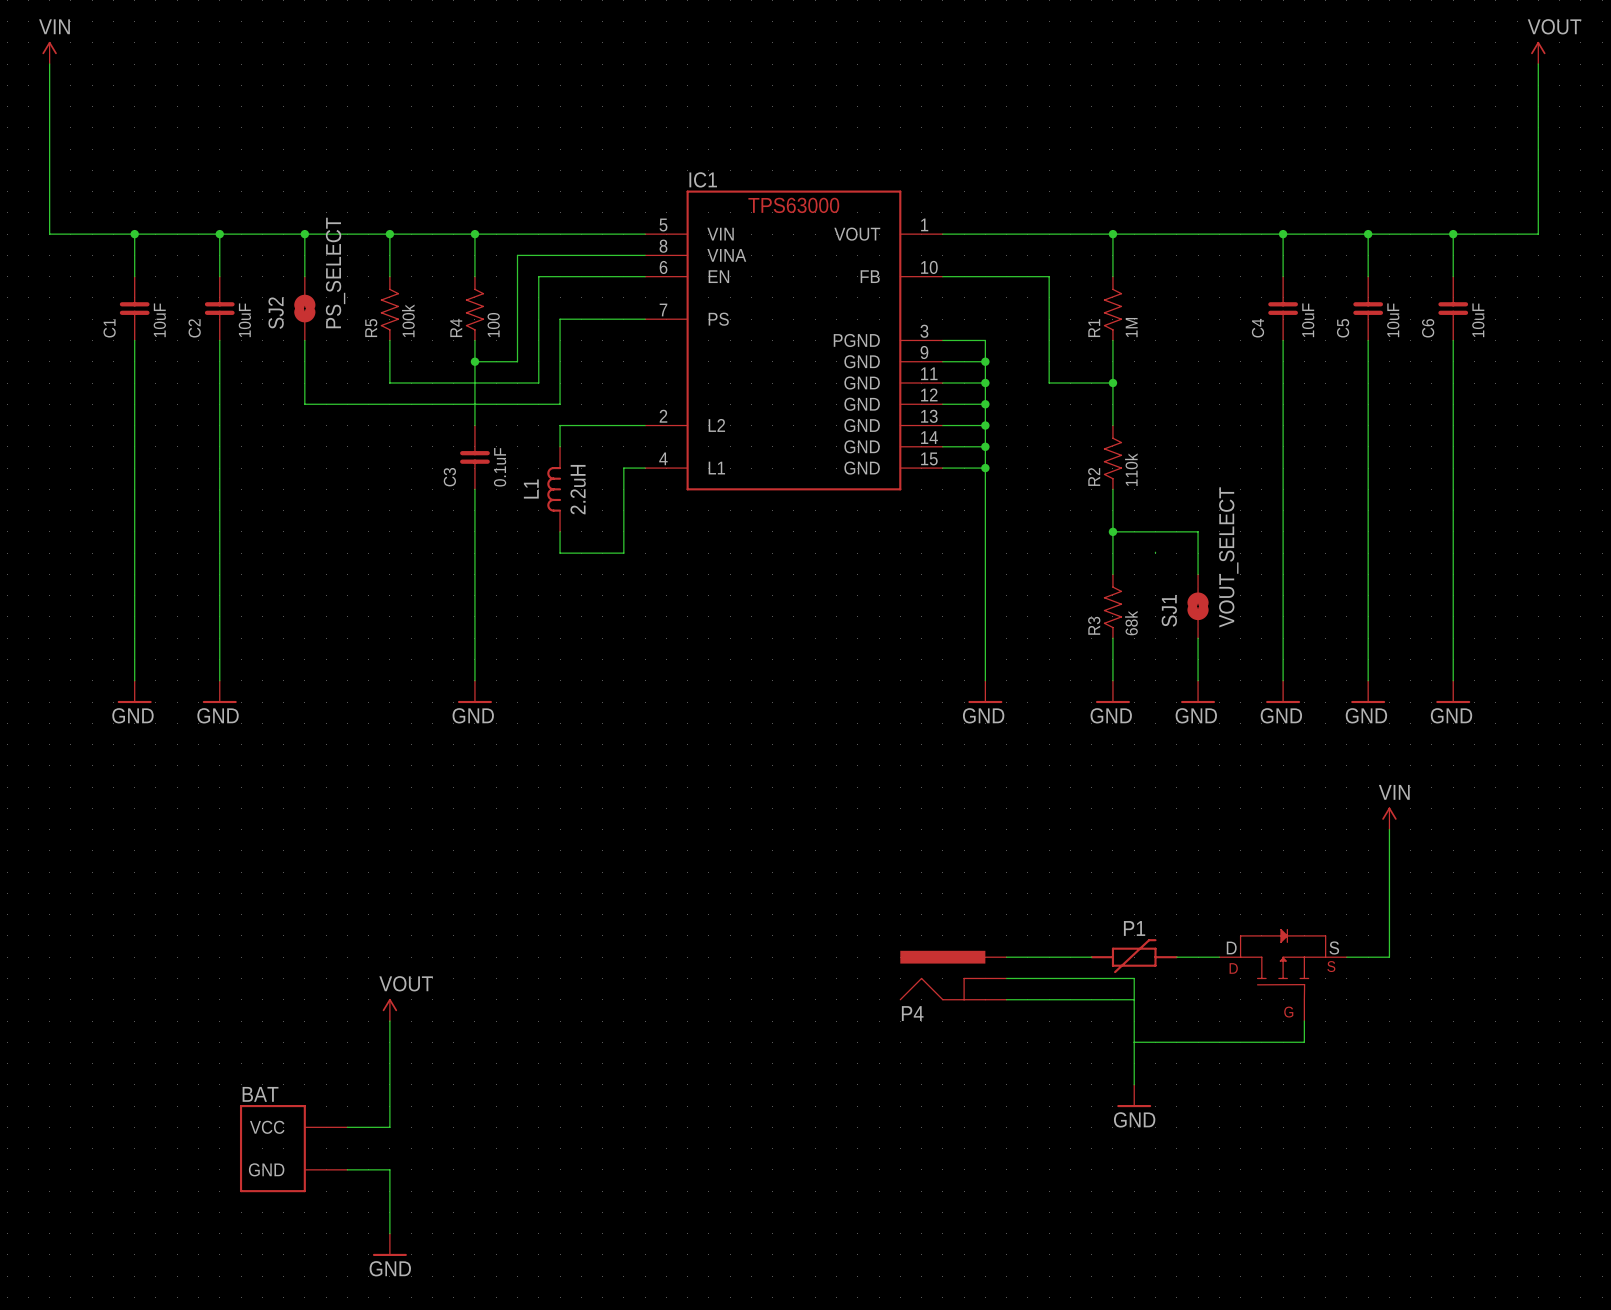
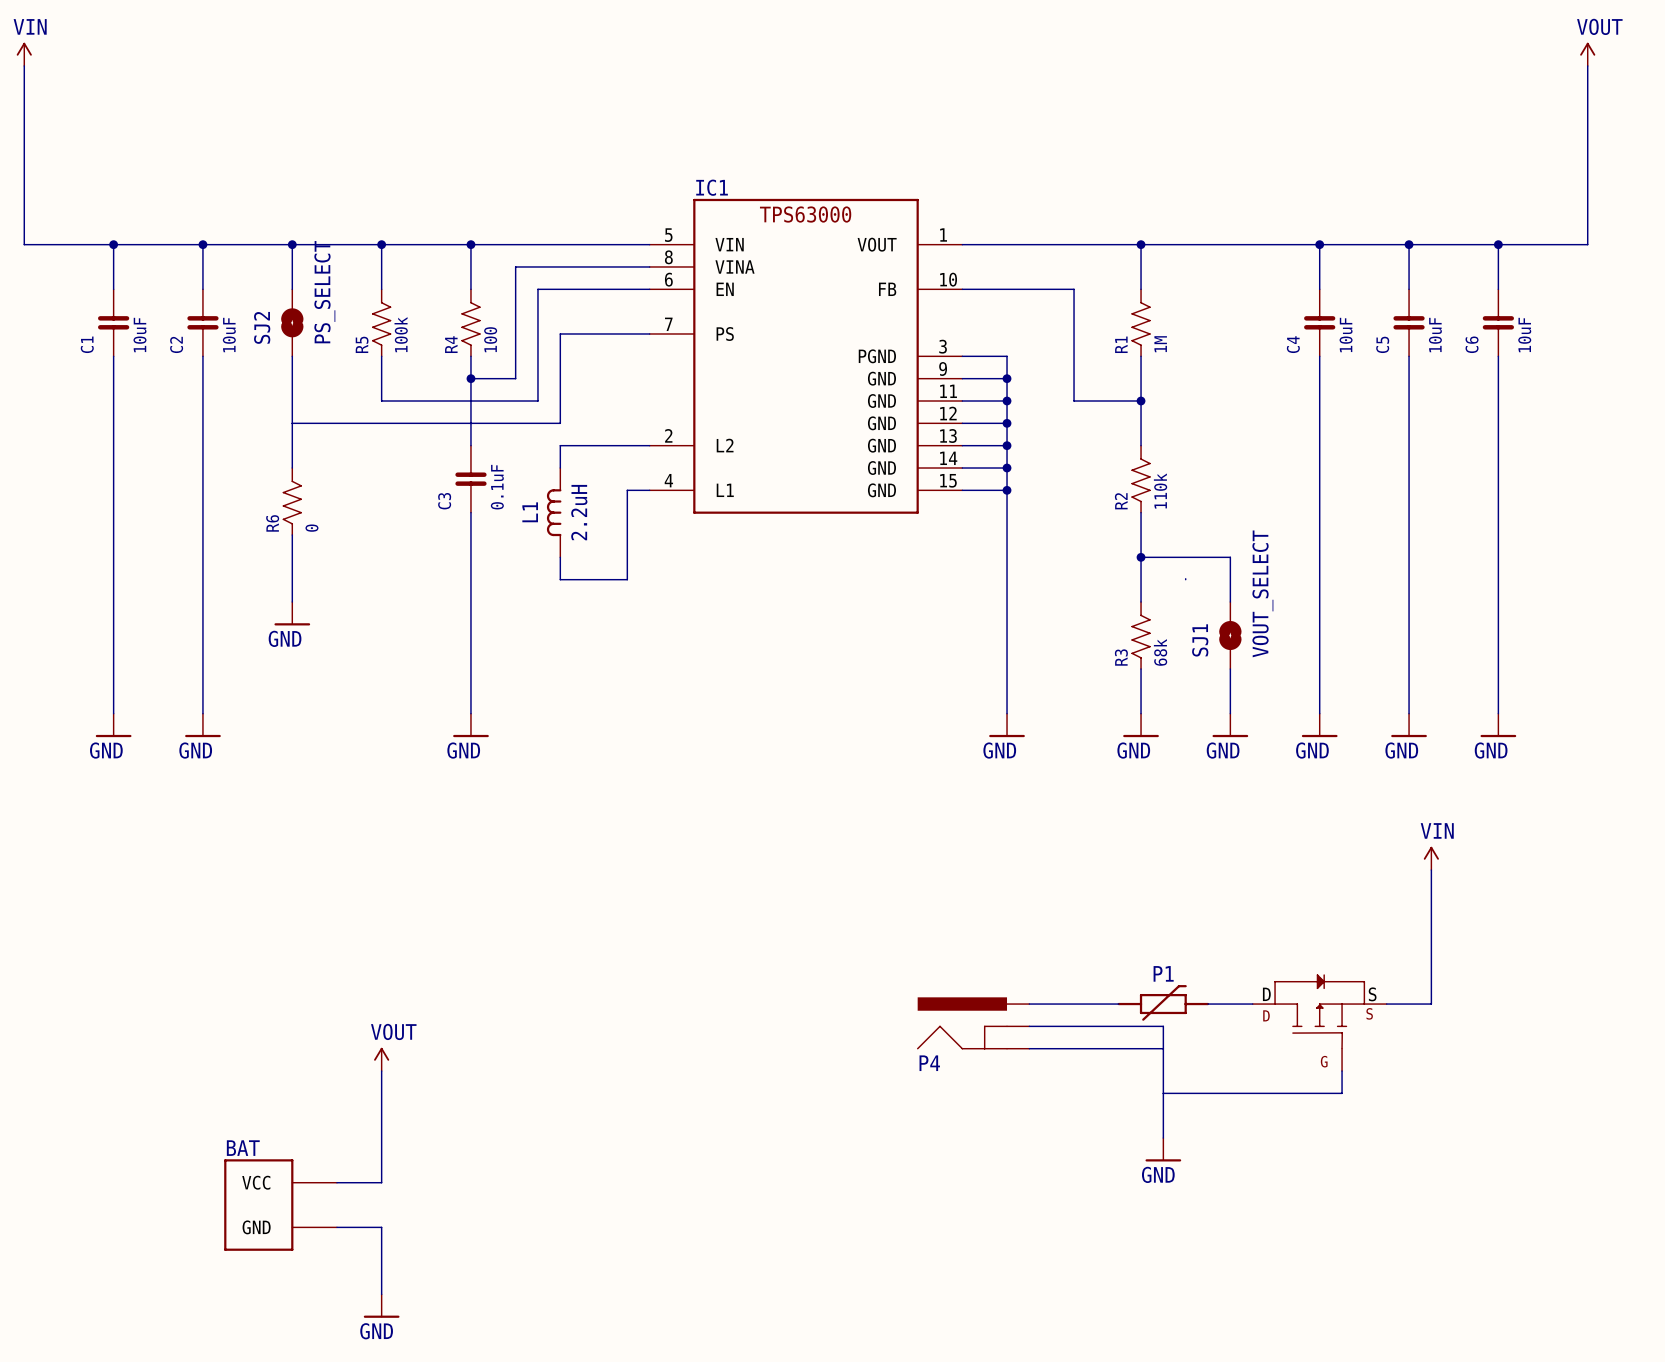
wire: none -> (292, 423) (292, 468)
R6: none -> 0 (292, 501)
wire: none -> (292, 535) (292, 602)
power symbol: none -> GND (292, 613)

